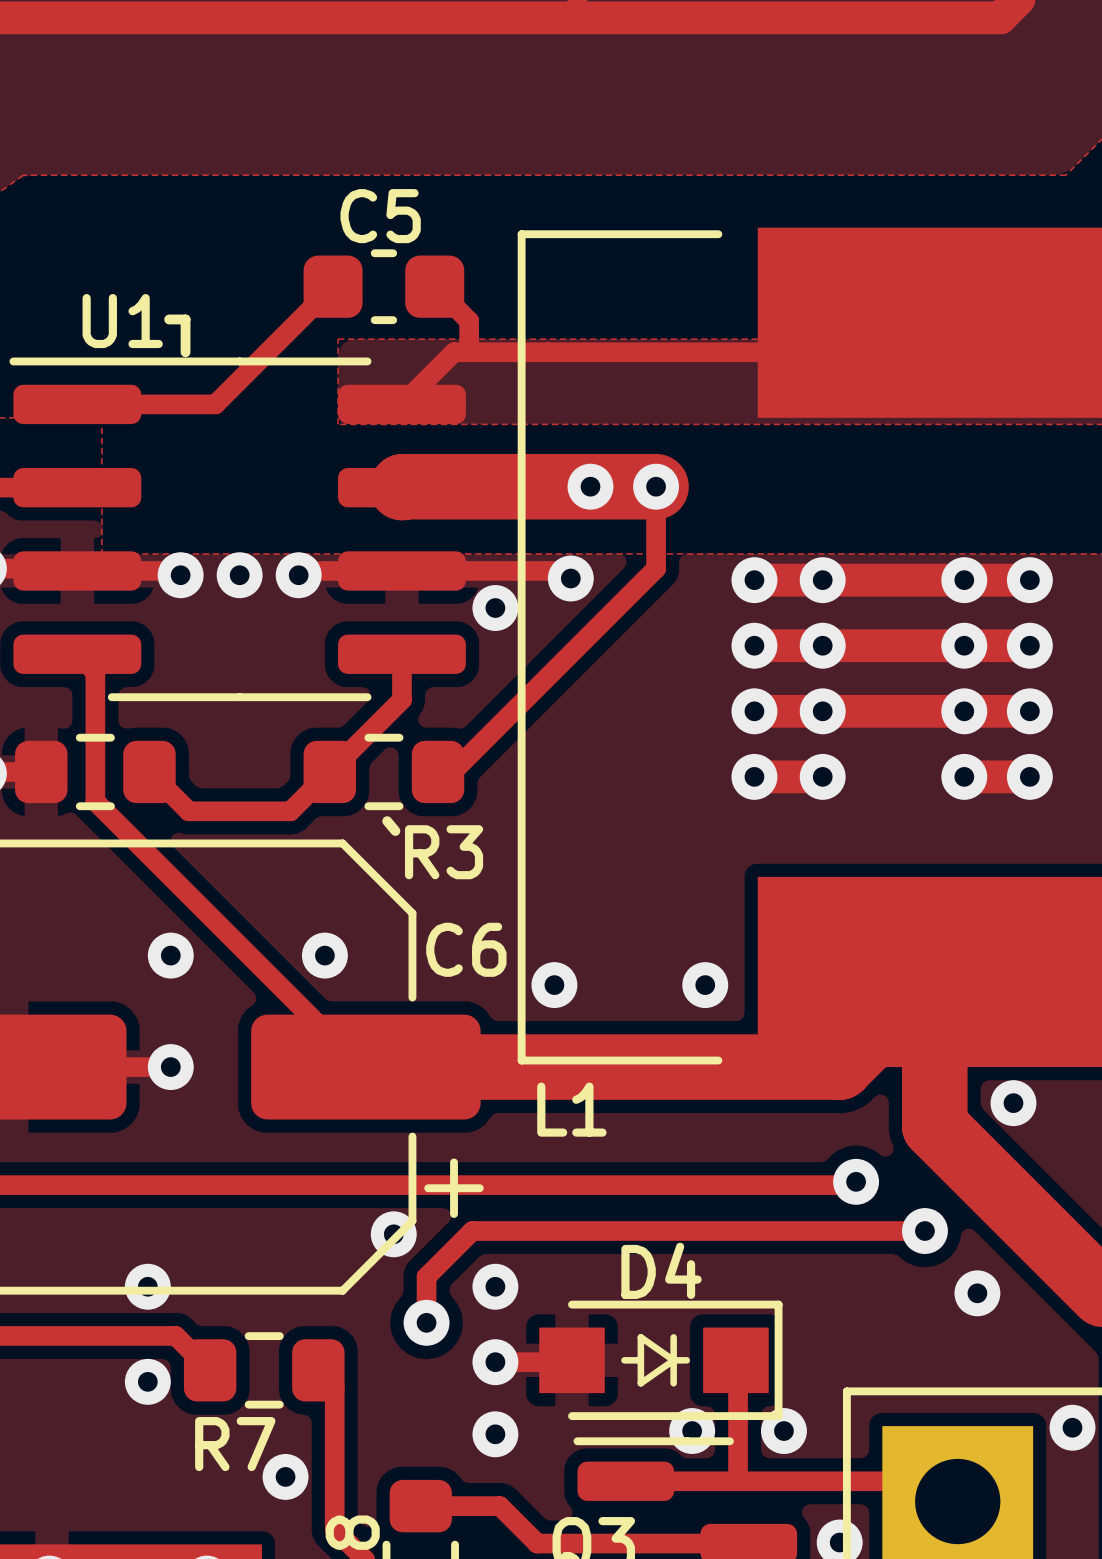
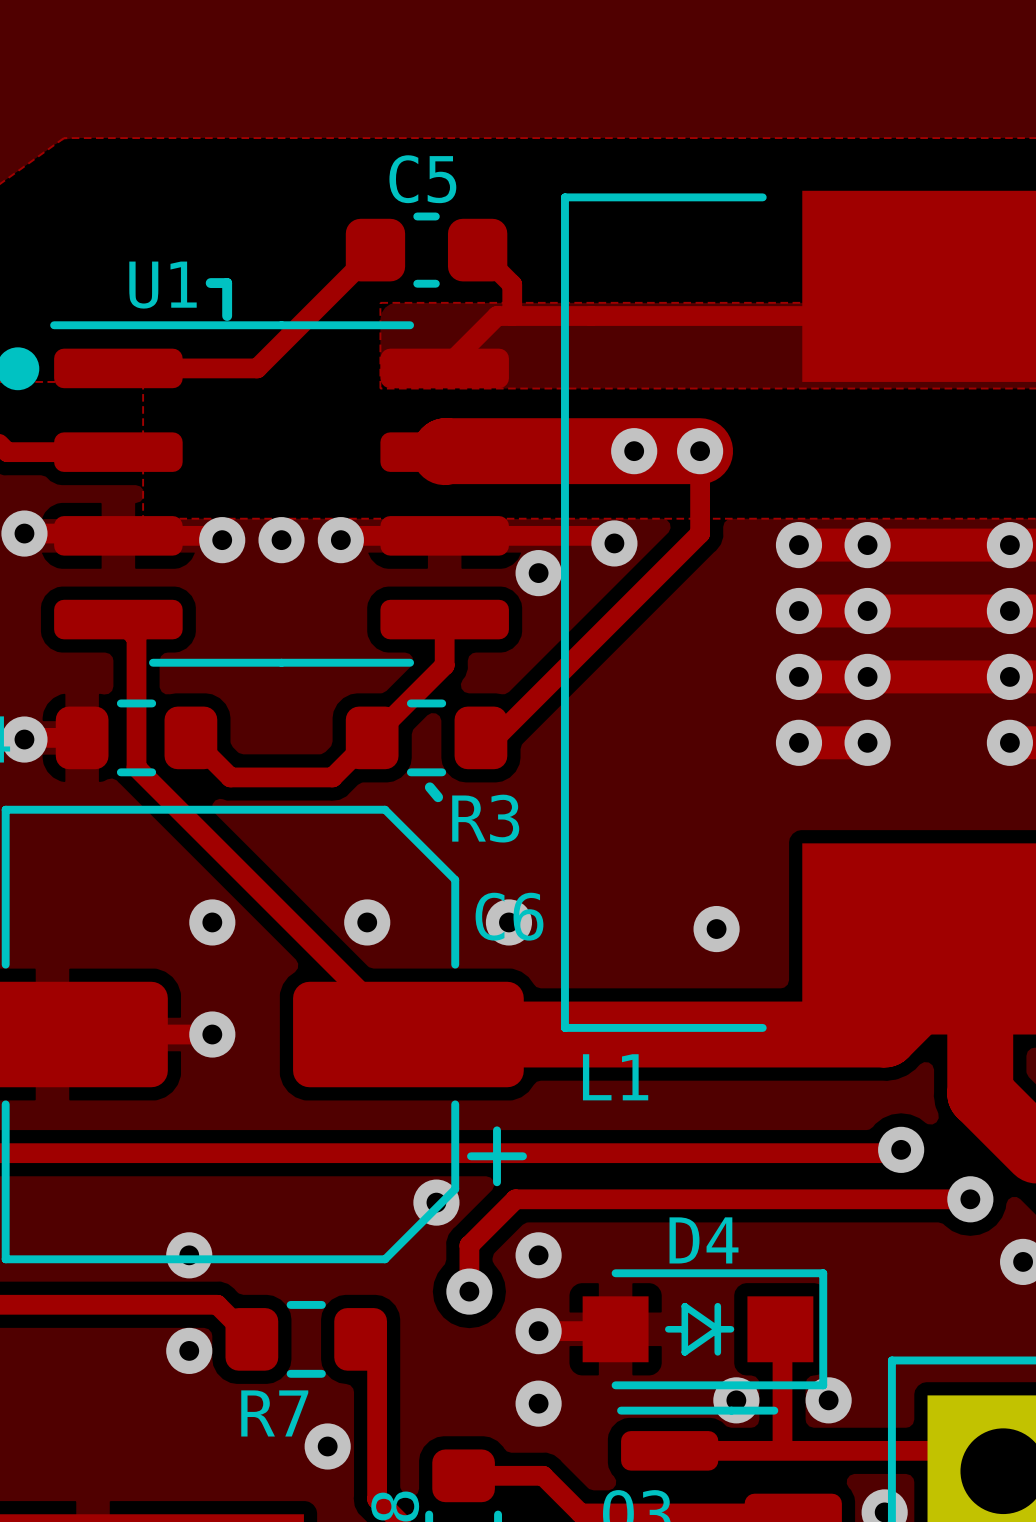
via: none -> (508, 922)
via: (554, 985) -> none
via position: (705, 985) -> (716, 929)

